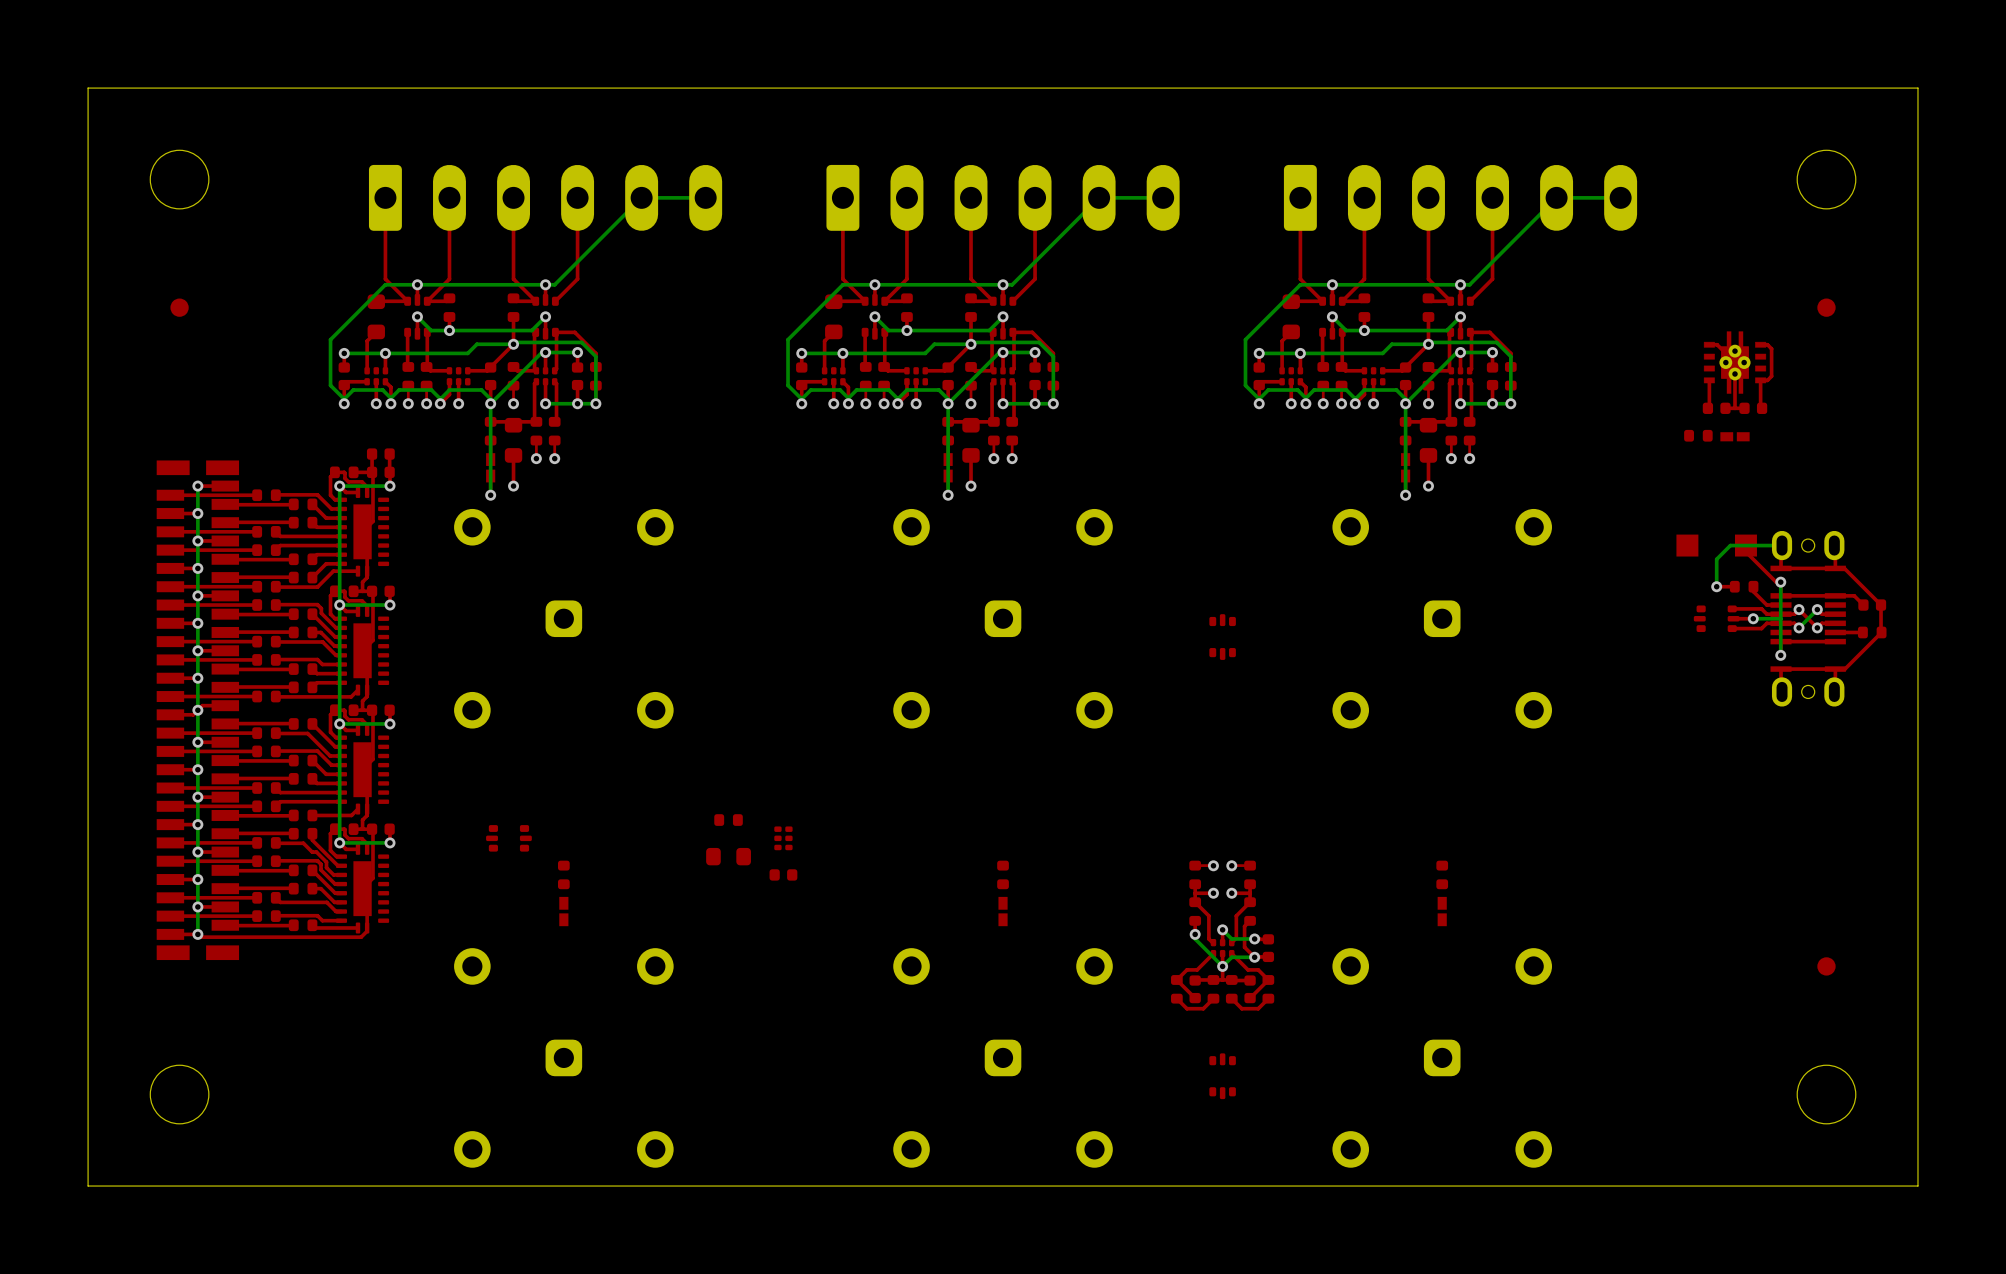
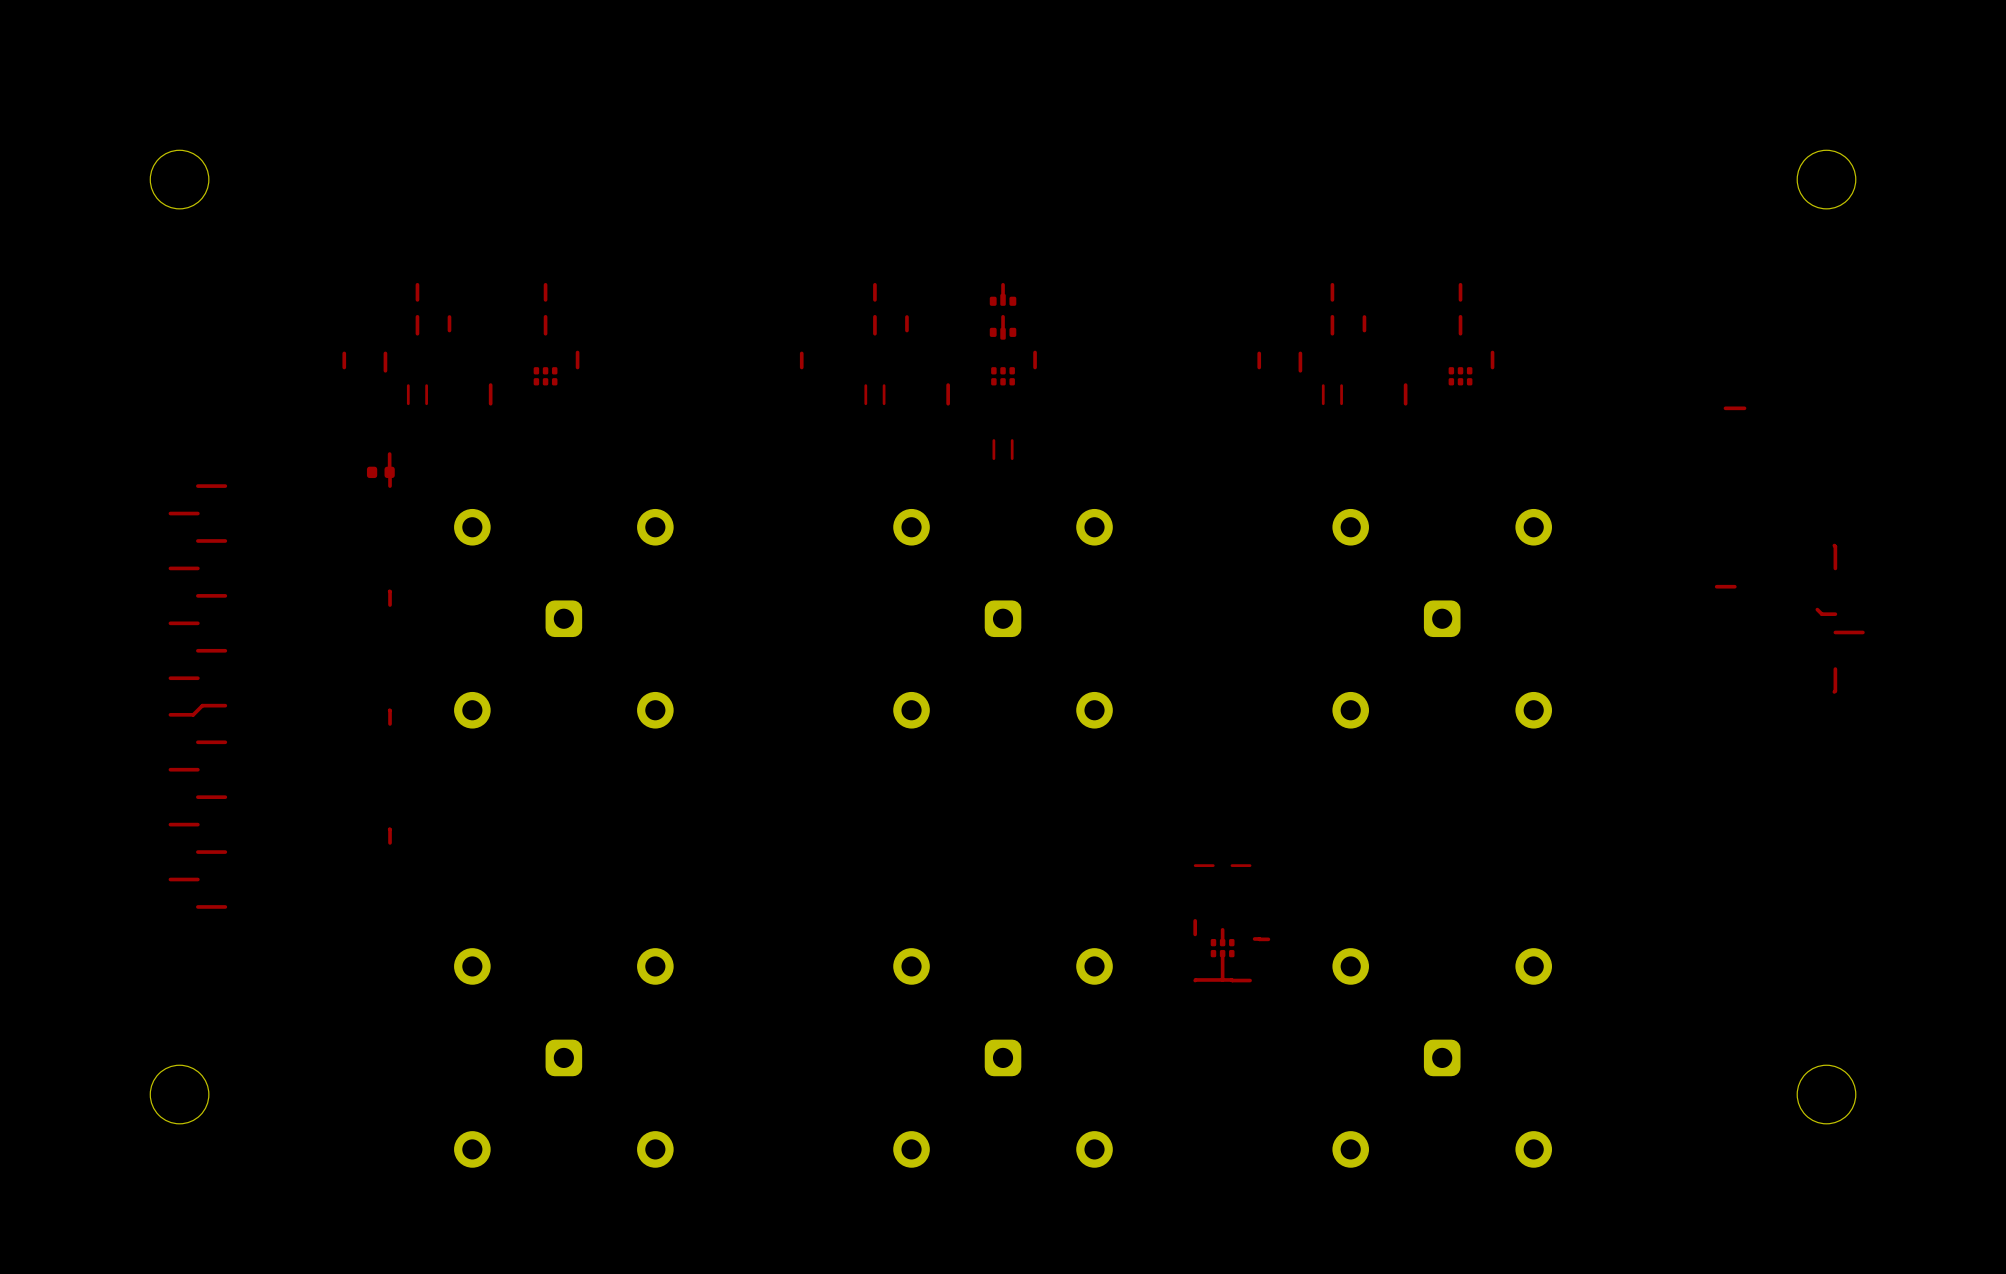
board edge: (1917, 88) (88, 88) (88, 1186) (1917, 1186) (1917, 88) -> none
top track: (385, 197) (385, 279) (407, 301) (376, 301) -> none
top track: (449, 197) (449, 279) (427, 301) (446, 301) (449, 298) -> none
top track: (513, 197) (513, 279) (535, 301) (516, 301) (513, 298) -> none
part: (545, 197) -> none
top track: (577, 197) (577, 279) (555, 301) -> none
bottom track: (705, 197) (641, 197) (554, 284) (385, 284) (330, 339) (330, 385) (344, 399) -> none
top track: (842, 197) (842, 279) (865, 301) (833, 301) -> none
top track: (906, 197) (906, 279) (884, 301) (904, 301) (906, 298) -> none
top track: (971, 197) (971, 279) (993, 301) (973, 301) (971, 298) -> none
part: (1003, 197) -> none
top track: (1035, 197) (1035, 279) (1012, 301) -> none
bottom track: (1163, 197) (1099, 197) (1012, 284) (842, 284) (788, 339) (788, 385) (801, 399) -> none
top track: (1300, 197) (1300, 279) (1322, 301) (1291, 301) -> none
top track: (1364, 197) (1364, 279) (1342, 301) (1361, 301) (1364, 298) -> none
top track: (1428, 197) (1428, 279) (1450, 301) (1431, 301) (1428, 298) -> none
part: (1460, 197) -> none
top track: (1492, 197) (1492, 279) (1470, 301) -> none
bottom track: (1620, 197) (1556, 197) (1469, 284) (1300, 284) (1245, 339) (1245, 385) (1259, 399) -> none
via: (417, 284) -> none
via: (545, 284) -> none
via: (874, 284) -> none
via: (1003, 284) -> none
via: (1332, 284) -> none
via: (1460, 284) -> none
part: (179, 307) -> none
part: (449, 307) -> none
part: (513, 307) -> none
part: (906, 307) -> none
part: (971, 307) -> none
part: (1364, 307) -> none
part: (1428, 307) -> none
part: (1826, 307) -> none
part: (376, 316) -> none
part: (417, 316) -> none
via: (417, 316) -> none
bottom track: (545, 316) (531, 330) (431, 330) (417, 316) -> none
part: (545, 316) -> none
via: (545, 316) -> none
part: (833, 316) -> none
part: (874, 316) -> none
via: (874, 316) -> none
bottom track: (1003, 316) (989, 330) (888, 330) (874, 316) -> none
via: (1003, 316) -> none
part: (1291, 316) -> none
part: (1332, 316) -> none
via: (1332, 316) -> none
bottom track: (1460, 316) (1446, 330) (1346, 330) (1332, 316) -> none
part: (1460, 316) -> none
via: (1460, 316) -> none
top track: (513, 317) (513, 344) (490, 367) -> none
top track: (971, 317) (971, 344) (948, 367) -> none
top track: (1428, 317) (1428, 344) (1405, 367) -> none
via: (449, 330) -> none
via: (906, 330) -> none
via: (1364, 330) -> none
top track: (376, 331) (367, 341) (367, 370) -> none
top track: (833, 331) (824, 341) (824, 370) -> none
top track: (1291, 331) (1282, 341) (1282, 370) -> none
top track: (407, 332) (408, 366) -> none
top track: (427, 332) (426, 366) (430, 370) (449, 370) -> none
top track: (535, 332) (534, 368) (536, 370) (517, 370) (513, 366) -> none
top track: (865, 332) (865, 366) -> none
top track: (884, 332) (884, 366) (887, 370) (906, 370) -> none
top track: (993, 332) (992, 368) (993, 370) (974, 370) (971, 366) -> none
top track: (1322, 332) (1323, 366) -> none
top track: (1342, 332) (1341, 366) (1345, 370) (1364, 370) -> none
top track: (1450, 332) (1449, 368) (1451, 370) (1432, 370) (1428, 366) -> none
via: (513, 344) -> none
via: (971, 344) -> none
via: (1428, 344) -> none
top track: (1709, 344) (1717, 344) (1735, 362) (1735, 408) -> none
top track: (1760, 344) (1767, 344) (1771, 348) (1771, 376) (1767, 380) (1760, 380) (1762, 408) -> none
top track: (545, 352) (545, 370) -> none
via: (545, 352) -> none
bottom track: (577, 352) (541, 352) (490, 403) -> none
via: (577, 352) -> none
top track: (1003, 352) (1003, 370) -> none
via: (1003, 352) -> none
bottom track: (1035, 352) (999, 352) (948, 403) -> none
via: (1035, 352) -> none
top track: (1460, 352) (1460, 370) -> none
via: (1460, 352) -> none
bottom track: (1492, 352) (1456, 352) (1405, 403) -> none
via: (1492, 352) -> none
bottom track: (344, 353) (467, 353) (476, 344) (581, 342) (595, 356) (595, 403) (545, 403) -> none
via: (344, 353) -> none
via: (385, 353) -> none
bottom track: (801, 353) (925, 353) (934, 344) (1039, 342) (1053, 356) (1053, 403) (1003, 403) -> none
via: (801, 353) -> none
top track: (842, 353) (842, 370) -> none
via: (842, 353) -> none
bottom track: (1259, 353) (1382, 353) (1391, 344) (1496, 342) (1510, 356) (1510, 403) (1460, 403) -> none
via: (1259, 353) -> none
via: (1300, 353) -> none
part: (1735, 362) -> none
top track: (595, 366) (595, 353) (574, 332) (555, 332) (556, 368) (554, 370) -> none
top track: (1053, 366) (1053, 353) (1032, 332) (1012, 332) (1014, 368) (1012, 370) -> none
top track: (1510, 366) (1510, 353) (1489, 332) (1470, 332) (1471, 368) (1469, 370) -> none
top track: (490, 367) (487, 370) (467, 370) -> none
top track: (948, 367) (944, 370) (925, 370) -> none
top track: (1405, 367) (1402, 370) (1382, 370) -> none
part: (344, 376) -> none
part: (376, 376) -> none
part: (408, 376) -> none
part: (426, 376) -> none
part: (458, 376) -> none
part: (490, 376) -> none
part: (513, 376) -> none
part: (577, 376) -> none
part: (595, 376) -> none
part: (801, 376) -> none
part: (833, 376) -> none
part: (865, 376) -> none
part: (884, 376) -> none
part: (916, 376) -> none
part: (948, 376) -> none
part: (971, 376) -> none
part: (1035, 376) -> none
part: (1053, 376) -> none
part: (1259, 376) -> none
part: (1291, 376) -> none
part: (1323, 376) -> none
part: (1341, 376) -> none
part: (1373, 376) -> none
part: (1405, 376) -> none
part: (1428, 376) -> none
part: (1492, 376) -> none
part: (1510, 376) -> none
top track: (1709, 380) (1707, 408) -> none
top track: (367, 381) (347, 381) (344, 385) (344, 403) -> none
top track: (376, 381) (376, 403) -> none
top track: (385, 381) (390, 387) (390, 403) -> none
top track: (449, 381) (449, 394) (440, 403) -> none
top track: (458, 381) (458, 403) -> none
top track: (536, 381) (534, 383) (534, 420) (536, 421) (516, 421) (513, 425) (510, 421) (490, 421) -> none
top track: (545, 381) (545, 403) -> none
top track: (554, 381) (556, 383) (556, 420) (554, 421) -> none
top track: (824, 381) (805, 381) (801, 385) (801, 403) -> none
top track: (833, 381) (833, 403) -> none
top track: (842, 381) (848, 387) (848, 403) -> none
top track: (906, 381) (906, 394) (897, 403) -> none
top track: (916, 381) (916, 403) -> none
top track: (993, 381) (992, 383) (992, 420) (993, 421) (974, 421) (971, 425) (967, 421) (948, 421) -> none
top track: (1003, 381) (1003, 403) -> none
top track: (1012, 381) (1014, 383) (1014, 420) (1012, 421) -> none
top track: (1282, 381) (1262, 381) (1259, 385) (1259, 403) -> none
top track: (1291, 381) (1291, 403) -> none
top track: (1300, 381) (1305, 387) (1305, 403) -> none
top track: (1364, 381) (1364, 394) (1355, 403) -> none
top track: (1373, 381) (1373, 403) -> none
top track: (1451, 381) (1449, 383) (1449, 420) (1451, 421) (1431, 421) (1428, 425) (1425, 421) (1405, 421) -> none
top track: (1460, 381) (1460, 403) -> none
top track: (1469, 381) (1471, 383) (1471, 420) (1469, 421) -> none
top track: (513, 385) (513, 403) -> none
top track: (577, 385) (577, 403) -> none
top track: (971, 385) (971, 403) -> none
top track: (1035, 385) (1035, 403) -> none
top track: (1428, 385) (1428, 403) -> none
top track: (1492, 385) (1492, 403) -> none
bottom track: (390, 398) (382, 390) (353, 390) (344, 399) -> none
bottom track: (390, 398) (399, 390) (431, 390) (440, 398) (440, 403) -> none
bottom track: (848, 398) (856, 390) (888, 390) (897, 398) (897, 403) -> none
bottom track: (848, 398) (840, 390) (810, 390) (801, 399) -> none
bottom track: (1305, 398) (1314, 390) (1346, 390) (1355, 398) (1355, 403) -> none
bottom track: (1305, 398) (1297, 390) (1268, 390) (1259, 399) -> none
bottom track: (440, 399) (449, 390) (481, 390) (490, 399) (490, 495) -> none
bottom track: (897, 399) (906, 390) (938, 390) (948, 399) (948, 495) -> none
bottom track: (1355, 399) (1364, 390) (1396, 390) (1405, 399) (1405, 495) -> none
via: (344, 403) -> none
via: (376, 403) -> none
via: (390, 403) -> none
via: (408, 403) -> none
via: (426, 403) -> none
via: (440, 403) -> none
via: (458, 403) -> none
via: (490, 403) -> none
via: (513, 403) -> none
via: (545, 403) -> none
via: (577, 403) -> none
via: (595, 403) -> none
via: (801, 403) -> none
via: (833, 403) -> none
via: (848, 403) -> none
via: (865, 403) -> none
via: (884, 403) -> none
via: (897, 403) -> none
via: (916, 403) -> none
via: (948, 403) -> none
via: (971, 403) -> none
via: (1003, 403) -> none
via: (1035, 403) -> none
via: (1053, 403) -> none
via: (1259, 403) -> none
via: (1291, 403) -> none
via: (1305, 403) -> none
via: (1323, 403) -> none
via: (1341, 403) -> none
via: (1355, 403) -> none
via: (1373, 403) -> none
via: (1405, 403) -> none
via: (1428, 403) -> none
via: (1460, 403) -> none
via: (1492, 403) -> none
via: (1510, 403) -> none
part: (1716, 408) -> none
part: (1753, 408) -> none
part: (490, 431) -> none
part: (536, 431) -> none
part: (554, 431) -> none
part: (948, 431) -> none
part: (993, 431) -> none
part: (1012, 431) -> none
part: (1405, 431) -> none
part: (1451, 431) -> none
part: (1469, 431) -> none
part: (1698, 435) -> none
part: (1735, 436) -> none
part: (513, 440) -> none
top track: (536, 440) (536, 458) -> none
top track: (554, 440) (554, 458) -> none
part: (971, 440) -> none
part: (1428, 440) -> none
top track: (1451, 440) (1451, 458) -> none
top track: (1469, 440) (1469, 458) -> none
top track: (372, 454) (372, 521) (362, 531) (367, 536) (367, 577) (362, 582) (362, 591) -> none
part: (380, 454) -> none
top track: (513, 455) (513, 486) -> none
top track: (971, 455) (971, 486) -> none
top track: (1428, 455) (1428, 486) -> none
via: (536, 458) -> none
via: (554, 458) -> none
via: (993, 458) -> none
via: (1012, 458) -> none
via: (1451, 458) -> none
via: (1469, 458) -> none
part: (490, 467) -> none
part: (948, 467) -> none
part: (1405, 467) -> none
part: (344, 472) -> none
top track: (371, 472) (353, 472) -> none
bottom track: (197, 486) (197, 934) -> none
via: (197, 486) -> none
top track: (339, 486) (346, 492) (357, 492) -> none
via: (339, 486) -> none
bottom track: (390, 486) (339, 486) (339, 842) (390, 842) -> none
via: (390, 486) -> none
via: (513, 486) -> none
via: (971, 486) -> none
via: (1428, 486) -> none
top track: (367, 492) (367, 486) (362, 481) (348, 481) (344, 478) (344, 472) (334, 472) (330, 476) (330, 495) (335, 499) (341, 499) -> none
top track: (257, 495) (170, 495) -> none
part: (266, 495) -> none
top track: (275, 495) (317, 494) (331, 508) (341, 508) -> none
via: (490, 495) -> none
via: (948, 495) -> none
via: (1405, 495) -> none
top track: (293, 504) (225, 504) -> none
part: (303, 504) -> none
top track: (312, 504) (326, 518) (341, 518) -> none
via: (197, 513) -> none
top track: (293, 522) (225, 522) -> none
part: (303, 522) -> none
top track: (312, 522) (317, 527) (341, 527) -> none
top track: (257, 531) (170, 531) -> none
part: (266, 531) -> none
top track: (275, 531) (280, 536) (341, 536) -> none
part: (362, 531) -> none
via: (197, 540) -> none
top track: (341, 545) (280, 545) (275, 550) -> none
part: (1716, 545) -> none
top track: (1745, 545) (1745, 551) (1776, 582) (1781, 582) (1781, 595) (1854, 595) (1863, 605) -> none
top track: (1782, 545) (1781, 568) (1844, 568) (1881, 605) (1881, 632) (1844, 669) (1781, 669) (1782, 691) -> none
bottom track: (1782, 545) (1730, 545) (1716, 559) (1716, 586) -> none
top track: (257, 550) (170, 550) -> none
part: (266, 550) -> none
top track: (341, 554) (317, 554) (312, 559) -> none
top track: (293, 559) (225, 559) -> none
part: (303, 559) -> none
top track: (341, 563) (326, 563) (312, 577) -> none
via: (197, 568) -> none
top track: (357, 571) (333, 571) (317, 587) (275, 586) -> none
top track: (293, 577) (225, 577) -> none
part: (303, 577) -> none
bottom track: (1780, 582) (1780, 655) -> none
via: (1780, 582) -> none
top track: (257, 586) (170, 586) -> none
part: (266, 586) -> none
via: (1716, 586) -> none
part: (1744, 586) -> none
top track: (1753, 586) (1753, 591) (1766, 605) (1781, 605) -> none
part: (344, 591) -> none
top track: (353, 591) (372, 592) (372, 640) (362, 650) (367, 655) (367, 696) (362, 701) (362, 710) -> none
part: (380, 591) -> none
via: (197, 595) -> none
top track: (257, 605) (170, 605) -> none
part: (266, 605) -> none
top track: (275, 605) (317, 604) (321, 608) (321, 613) (336, 627) (341, 627) -> none
top track: (339, 605) (346, 611) (357, 611) -> none
via: (339, 605) -> none
bottom track: (390, 605) (339, 605) -> none
via: (390, 605) -> none
part: (1872, 605) -> none
top track: (1732, 608) (1761, 608) (1766, 614) (1794, 614) (1799, 609) (1817, 627) (1821, 623) (1835, 623) -> none
via: (1799, 609) -> none
bottom track: (1817, 609) (1799, 627) -> none
via: (1817, 609) -> none
top track: (367, 611) (367, 605) (362, 600) (348, 600) (344, 597) (344, 591) (334, 591) (330, 595) (330, 614) (335, 618) (341, 618) -> none
top track: (293, 614) (225, 614) -> none
part: (303, 614) -> none
top track: (312, 614) (335, 637) (341, 637) -> none
part: (1716, 618) -> none
top track: (1753, 618) (1733, 618) -> none
via: (1753, 618) -> none
bottom track: (1780, 618) (1753, 618) -> none
part: (1808, 618) -> none
via: (197, 623) -> none
top track: (1799, 627) (1794, 623) (1766, 623) (1761, 628) (1732, 628) -> none
via: (1799, 627) -> none
via: (1817, 627) -> none
top track: (293, 632) (225, 632) -> none
part: (303, 632) -> none
top track: (312, 632) (320, 632) (334, 646) (341, 646) -> none
part: (1872, 632) -> none
part: (1222, 637) -> none
top track: (257, 641) (170, 641) -> none
part: (266, 641) -> none
top track: (275, 641) (322, 641) (336, 655) (341, 655) -> none
top track: (1835, 641) (1781, 641) (1780, 655) -> none
via: (197, 650) -> none
part: (362, 650) -> none
via: (1780, 655) -> none
top track: (257, 659) (170, 659) -> none
part: (266, 659) -> none
top track: (275, 659) (317, 659) (322, 664) (341, 664) -> none
top track: (293, 669) (225, 669) -> none
part: (303, 669) -> none
top track: (312, 669) (317, 673) (341, 673) -> none
via: (197, 678) -> none
top track: (341, 682) (317, 682) (312, 687) -> none
top track: (293, 687) (225, 687) -> none
part: (303, 687) -> none
top track: (357, 690) (351, 696) (275, 696) -> none
top track: (257, 696) (170, 696) -> none
part: (266, 696) -> none
part: (197, 710) -> none
via: (197, 710) -> none
part: (344, 710) -> none
top track: (353, 710) (372, 711) (372, 759) (362, 769) (367, 774) (367, 815) (362, 820) (362, 829) -> none
part: (380, 710) -> none
top track: (293, 723) (225, 723) -> none
part: (303, 723) -> none
top track: (312, 723) (335, 746) (341, 746) -> none
top track: (339, 723) (346, 730) (357, 730) -> none
via: (339, 723) -> none
bottom track: (390, 723) (339, 723) -> none
via: (390, 723) -> none
top track: (367, 730) (367, 724) (362, 719) (348, 719) (344, 716) (344, 710) (334, 710) (330, 714) (330, 732) (336, 737) (341, 737) -> none
top track: (257, 733) (170, 733) -> none
part: (266, 733) -> none
top track: (275, 733) (307, 733) (330, 755) (341, 755) -> none
via: (197, 742) -> none
top track: (257, 751) (170, 751) -> none
part: (266, 751) -> none
top track: (275, 751) (317, 751) (331, 765) (341, 765) -> none
top track: (293, 760) (225, 760) -> none
part: (303, 760) -> none
top track: (312, 760) (326, 774) (341, 774) -> none
via: (197, 769) -> none
part: (362, 769) -> none
top track: (293, 778) (225, 778) -> none
part: (303, 778) -> none
top track: (312, 778) (317, 783) (341, 783) -> none
top track: (257, 788) (170, 788) -> none
part: (266, 788) -> none
top track: (275, 788) (280, 792) (341, 792) -> none
via: (197, 797) -> none
top track: (341, 801) (280, 801) (275, 806) -> none
top track: (257, 806) (170, 806) -> none
part: (266, 806) -> none
top track: (357, 809) (351, 815) (312, 815) -> none
top track: (293, 815) (225, 815) -> none
part: (303, 815) -> none
part: (728, 820) -> none
via: (197, 824) -> none
part: (344, 829) -> none
top track: (353, 829) (372, 830) (372, 878) (362, 888) (367, 893) (367, 931) (361, 937) (200, 937) (197, 934) (170, 934) -> none
part: (380, 829) -> none
top track: (293, 833) (225, 833) -> none
part: (303, 833) -> none
top track: (312, 833) (312, 840) (337, 865) (341, 865) -> none
part: (508, 838) -> none
part: (783, 838) -> none
top track: (257, 842) (170, 842) -> none
part: (266, 842) -> none
top track: (275, 842) (303, 843) (326, 862) (326, 867) (333, 874) (341, 874) -> none
top track: (339, 842) (346, 849) (357, 849) -> none
via: (339, 842) -> none
via: (390, 842) -> none
top track: (367, 849) (367, 843) (362, 838) (348, 838) (344, 835) (344, 829) (334, 829) (330, 833) (330, 850) (336, 856) (341, 856) -> none
via: (197, 852) -> none
part: (728, 856) -> none
top track: (257, 861) (170, 861) -> none
part: (266, 861) -> none
top track: (275, 861) (317, 860) (321, 864) (321, 870) (335, 884) (341, 884) -> none
via: (1213, 865) -> none
via: (1231, 865) -> none
top track: (293, 870) (225, 870) -> none
part: (303, 870) -> none
top track: (312, 870) (335, 893) (341, 893) -> none
part: (563, 874) -> none
part: (783, 874) -> none
part: (1003, 874) -> none
part: (1195, 874) -> none
part: (1250, 874) -> none
part: (1442, 874) -> none
via: (197, 879) -> none
top track: (1195, 884) (1195, 902) (1208, 915) (1208, 938) (1213, 942) -> none
top track: (1250, 884) (1250, 902) (1236, 915) (1236, 938) (1231, 942) -> none
top track: (293, 888) (225, 888) -> none
part: (303, 888) -> none
top track: (312, 888) (320, 888) (334, 902) (341, 902) -> none
part: (362, 888) -> none
top track: (1213, 893) (1195, 893) -> none
via: (1213, 893) -> none
via: (1231, 893) -> none
top track: (1250, 893) (1231, 893) -> none
top track: (257, 897) (170, 897) -> none
part: (266, 897) -> none
top track: (275, 897) (280, 902) (326, 902) (336, 911) (341, 911) -> none
via: (197, 906) -> none
part: (563, 911) -> none
part: (1003, 911) -> none
part: (1195, 911) -> none
part: (1250, 911) -> none
part: (1442, 911) -> none
top track: (257, 916) (170, 916) -> none
part: (266, 916) -> none
top track: (275, 916) (317, 915) (322, 920) (341, 920) -> none
top track: (1250, 920) (1244, 926) (1244, 947) (1254, 957) (1268, 956) -> none
top track: (293, 925) (225, 925) -> none
part: (303, 925) -> none
top track: (312, 925) (315, 928) (357, 928) -> none
bottom track: (1222, 929) (1231, 938) (1254, 938) -> none
via: (1222, 929) -> none
via: (197, 934) -> none
bottom track: (1195, 934) (1195, 938) (1222, 966) (1231, 957) (1254, 957) -> none
via: (1195, 934) -> none
via: (1254, 938) -> none
part: (1268, 948) -> none
top track: (1213, 953) (1197, 969) (1186, 969) (1176, 979) (1194, 998) -> none
top track: (1231, 953) (1248, 969) (1258, 969) (1268, 979) (1250, 998) -> none
via: (1254, 957) -> none
via: (1222, 966) -> none
part: (1826, 966) -> none
part: (1176, 989) -> none
part: (1195, 989) -> none
part: (1213, 989) -> none
part: (1231, 989) -> none
part: (1250, 989) -> none
part: (1268, 989) -> none
top track: (1213, 998) (1203, 1008) (1186, 1008) (1176, 998) -> none
top track: (1268, 998) (1258, 1008) (1241, 1008) (1231, 998) -> none
part: (1222, 1076) -> none

